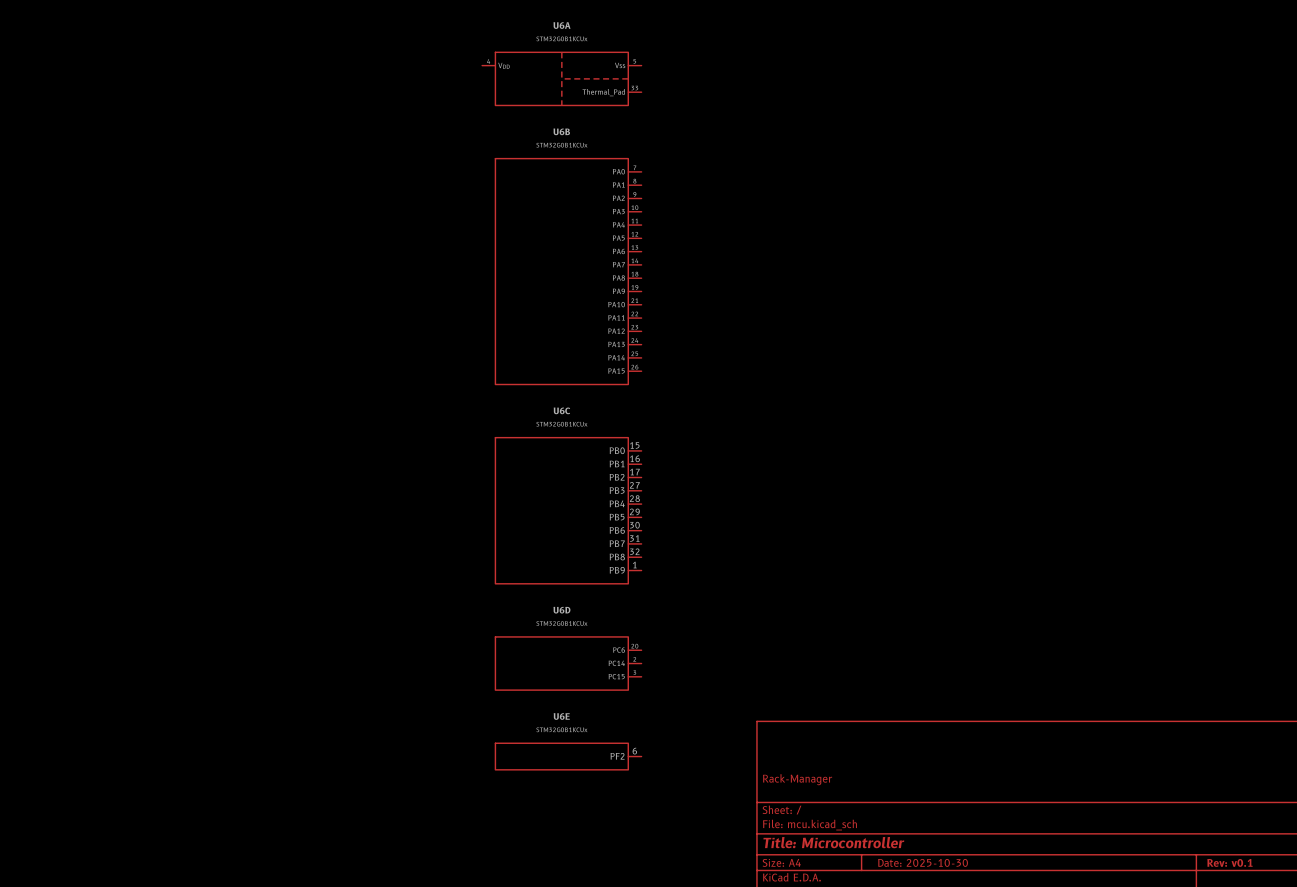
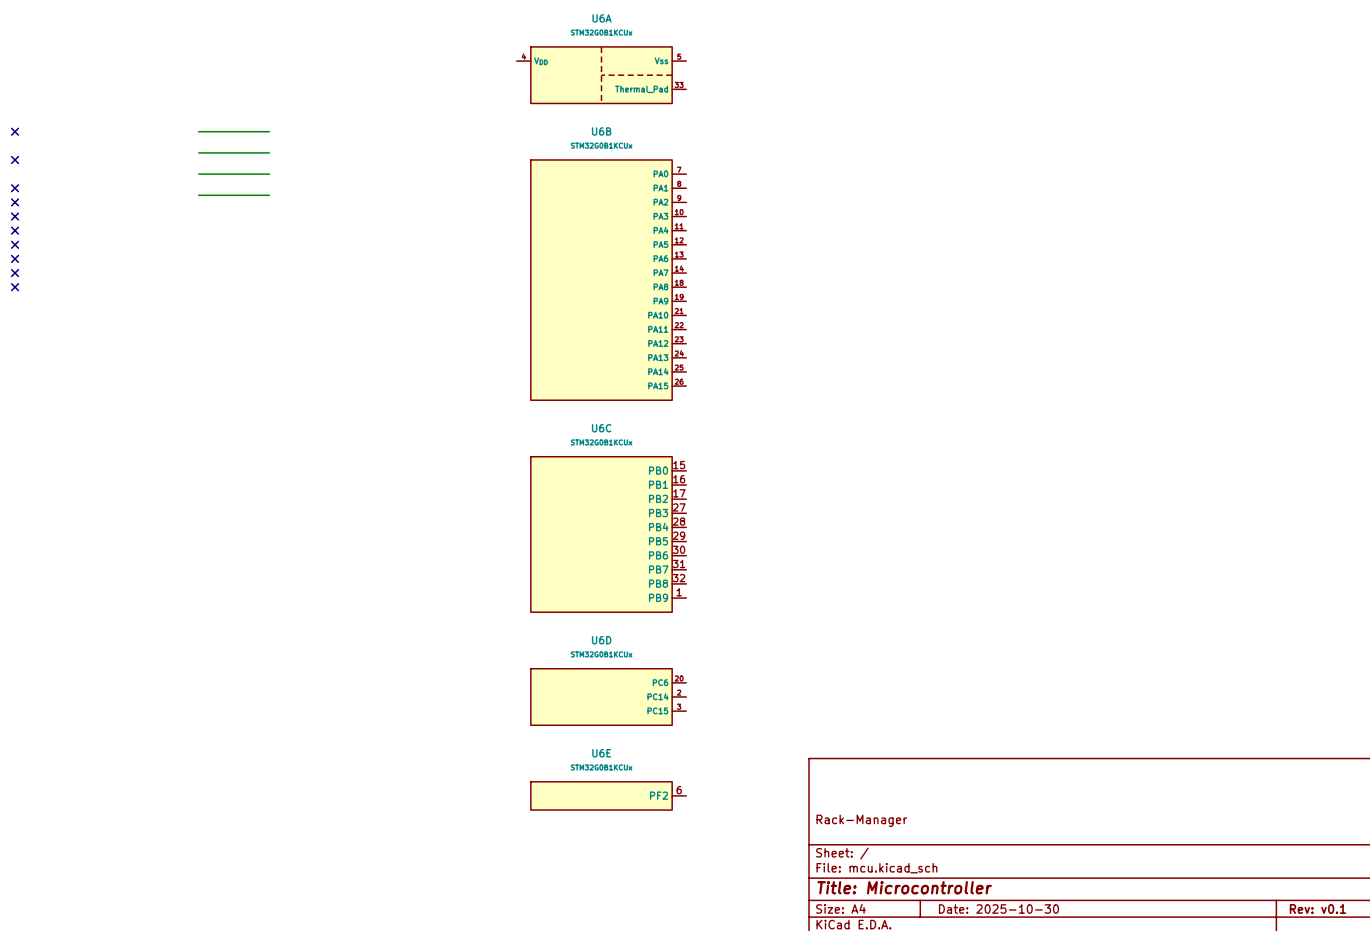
no-connect mark: none -> (15, 131)
wire: none -> (198, 131) (269, 131)
wire: none -> (198, 152) (269, 152)
no-connect mark: none -> (15, 159)
wire: none -> (198, 174) (269, 174)
no-connect mark: none -> (15, 188)
wire: none -> (198, 195) (269, 195)
no-connect mark: none -> (15, 202)
no-connect mark: none -> (15, 216)
no-connect mark: none -> (15, 230)
no-connect mark: none -> (15, 244)
no-connect mark: none -> (15, 258)
no-connect mark: none -> (15, 273)
no-connect mark: none -> (15, 287)

